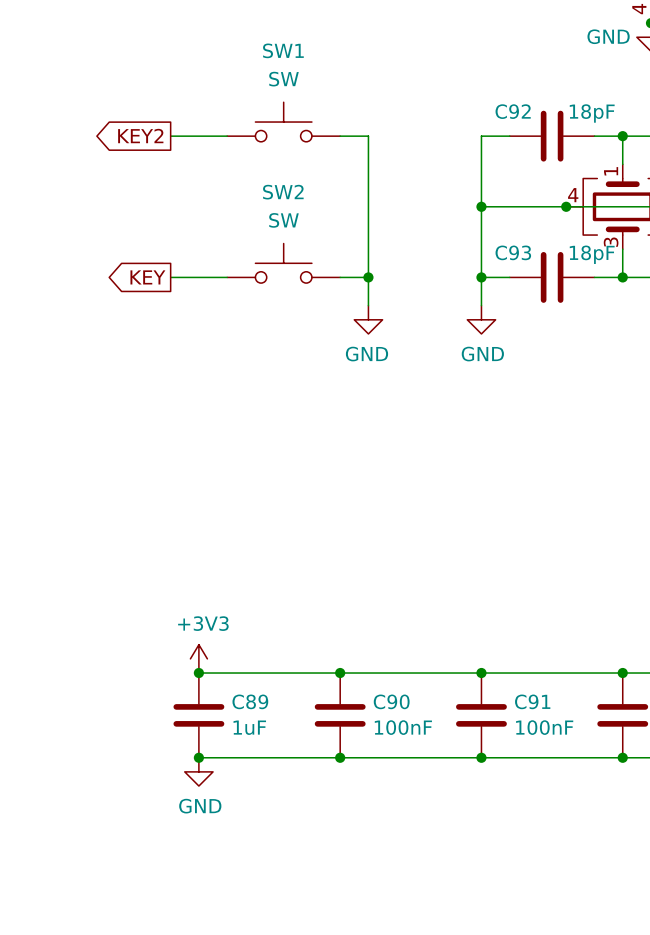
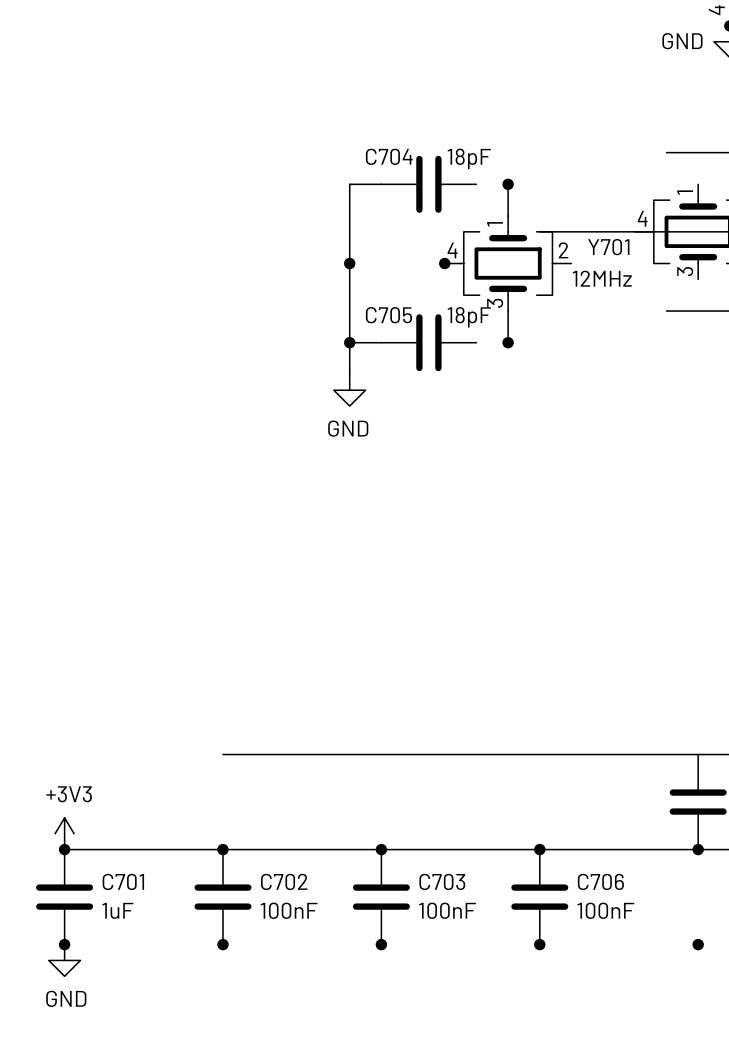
SW1: SW (283, 122) -> none
global label: KEY2 (140, 136) -> none
wire: (170, 136) (227, 136) -> none
wire: (340, 136) (368, 136) (368, 305) -> none
wire: (509, 136) (481, 136) (481, 305) -> (381, 184) (349, 184) (349, 374)
C92: 18pF (552, 136) -> none
wire: (622, 136) (622, 164) -> (508, 184) (508, 216)
junction: (622, 136) -> none
C704: none -> 18pF (428, 184)
junction: none -> (508, 184)
junction: (481, 206) -> none
junction: (566, 206) -> none
junction: none -> (349, 263)
junction: none -> (444, 263)
Y701: none -> 12MHz (508, 263)
wire: (622, 249) (622, 277) -> (508, 311) (508, 342)
SW2: SW (283, 263) -> none
global label: KEY (147, 277) -> none
wire: (170, 277) (227, 277) -> none
wire: (340, 277) (368, 277) -> none
junction: (368, 277) -> none
wire: (481, 277) (509, 277) -> (349, 342) (381, 342)
junction position: (481, 277) -> (508, 342)
C93: 18pF (552, 277) -> none
junction: (622, 277) -> none
junction: none -> (349, 342)
C705: none -> 18pF (428, 342)
power symbol position: GND (368, 319) -> GND (349, 390)
power symbol: GND (481, 319) -> none
power symbol position: +3V3 (198, 658) -> +3V3 (64, 833)
junction: (198, 673) -> none
junction: (340, 673) -> none
junction: (481, 673) -> none
junction: (622, 673) -> none
C89: 1uF (198, 715) -> none
C90: 100nF (340, 715) -> none
C91: 100nF (481, 715) -> none
wire: none -> (64, 849) (223, 849)
junction: none -> (64, 849)
power symbol position: GND (198, 771) -> GND (64, 960)
C701: none -> 1uF (64, 897)
C702: none -> 100nF (223, 897)
C703: none -> 100nF (381, 897)
C706: none -> 100nF (539, 897)
junction: none -> (64, 944)
junction: none -> (223, 944)
junction: none -> (381, 944)
junction: none -> (539, 944)
junction: none -> (698, 944)

